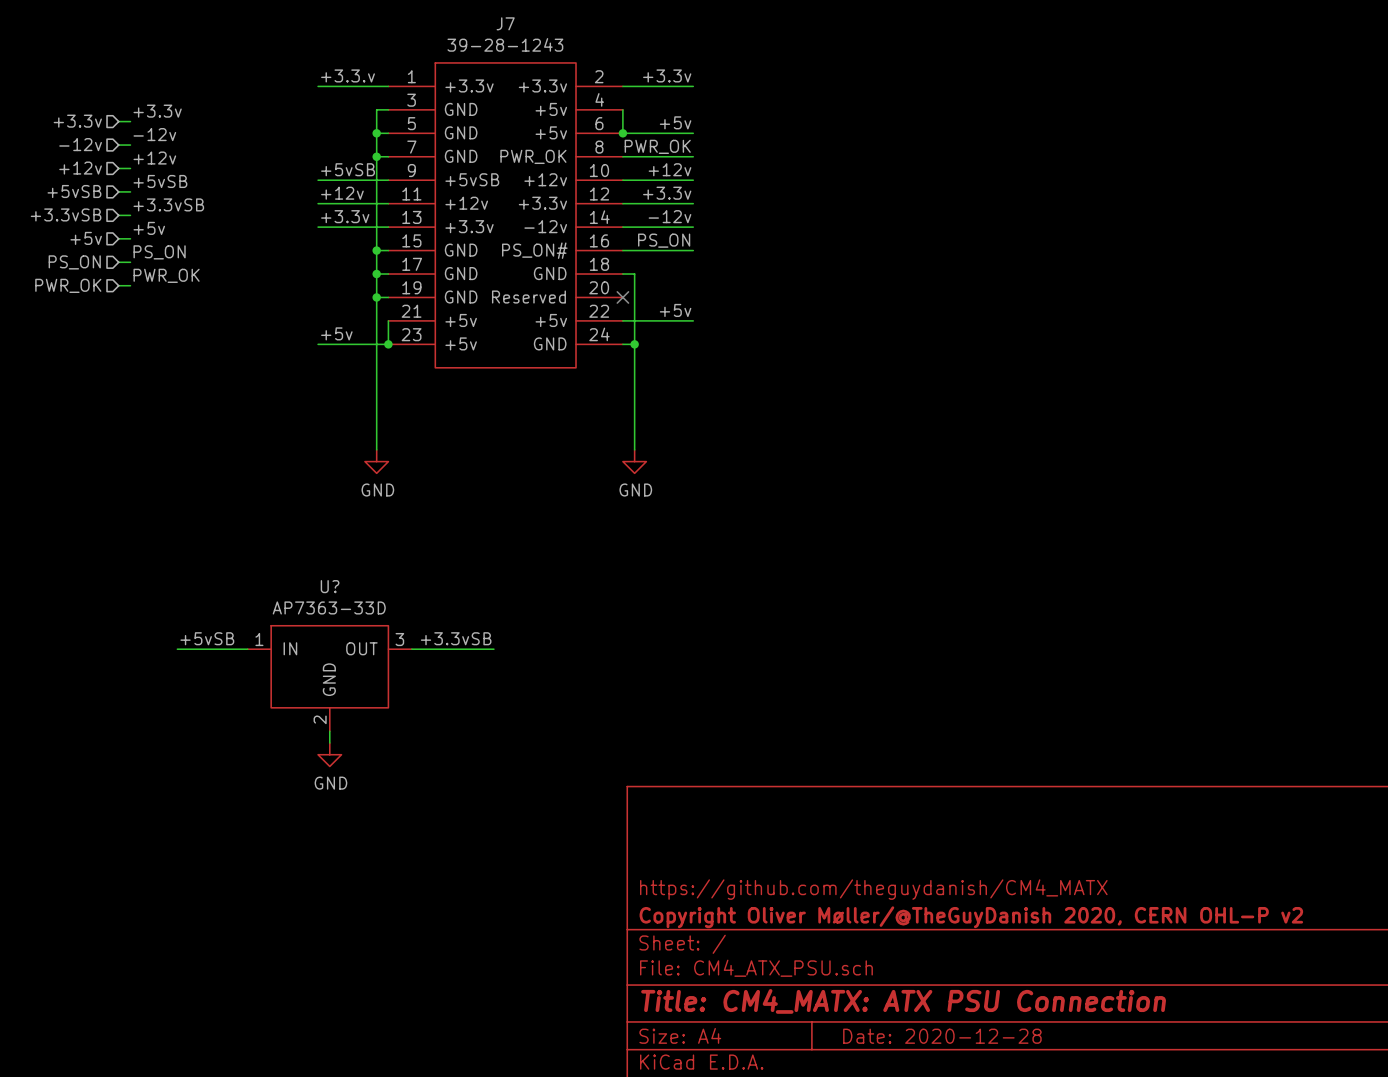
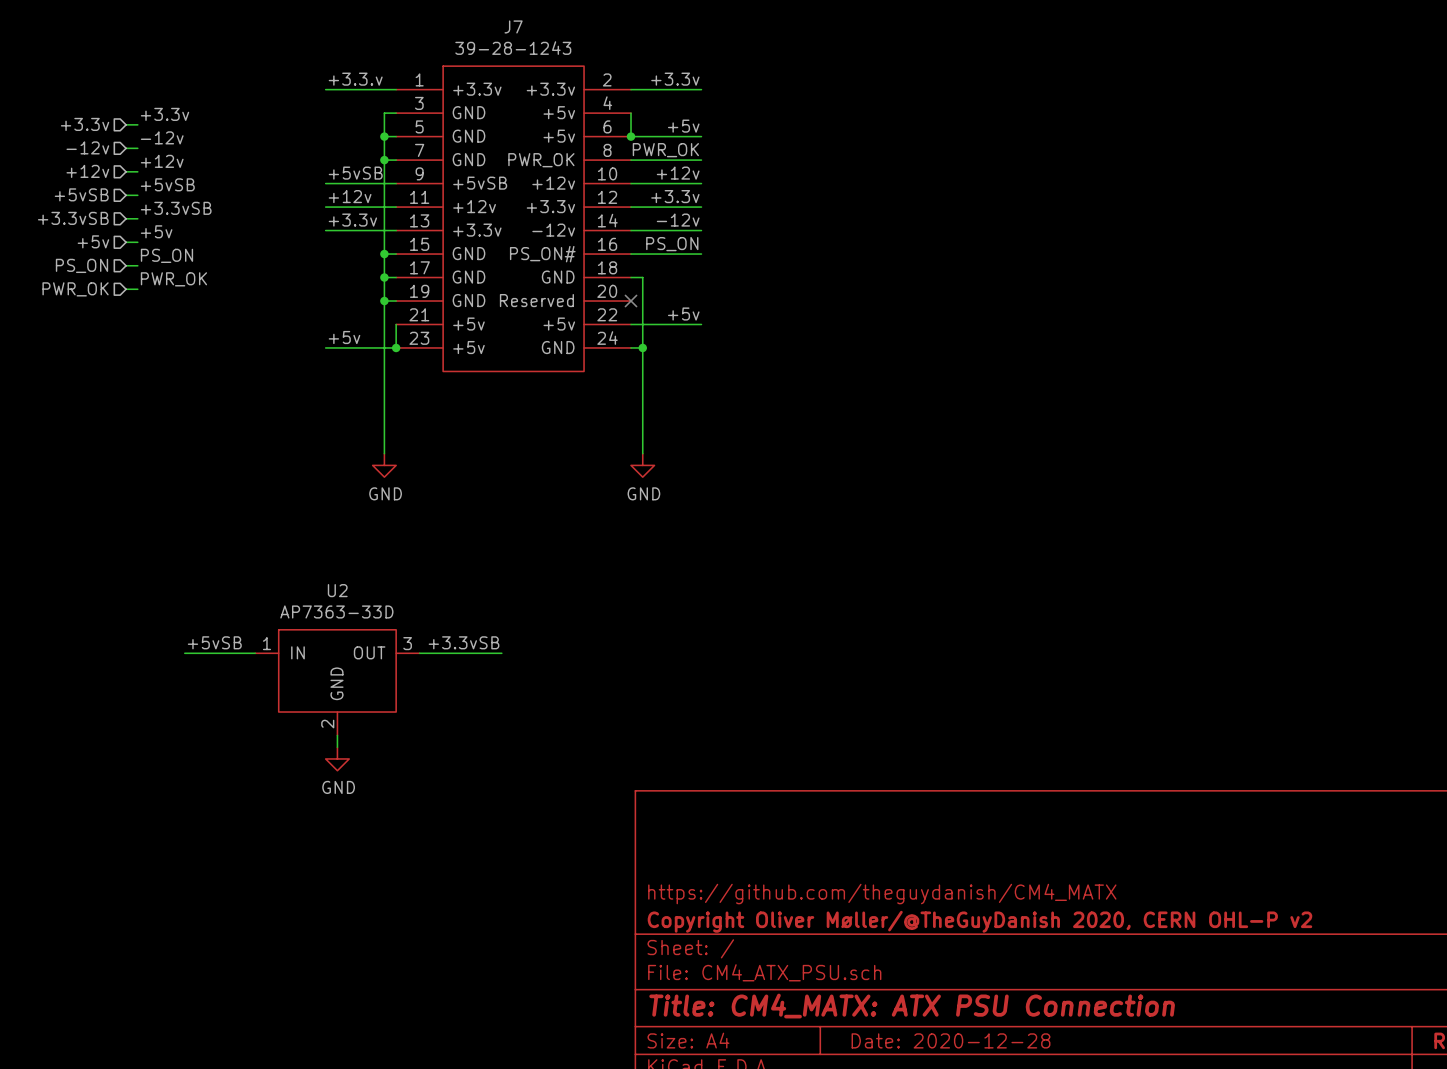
U? name: U? (330, 586) -> U2 (337, 590)

